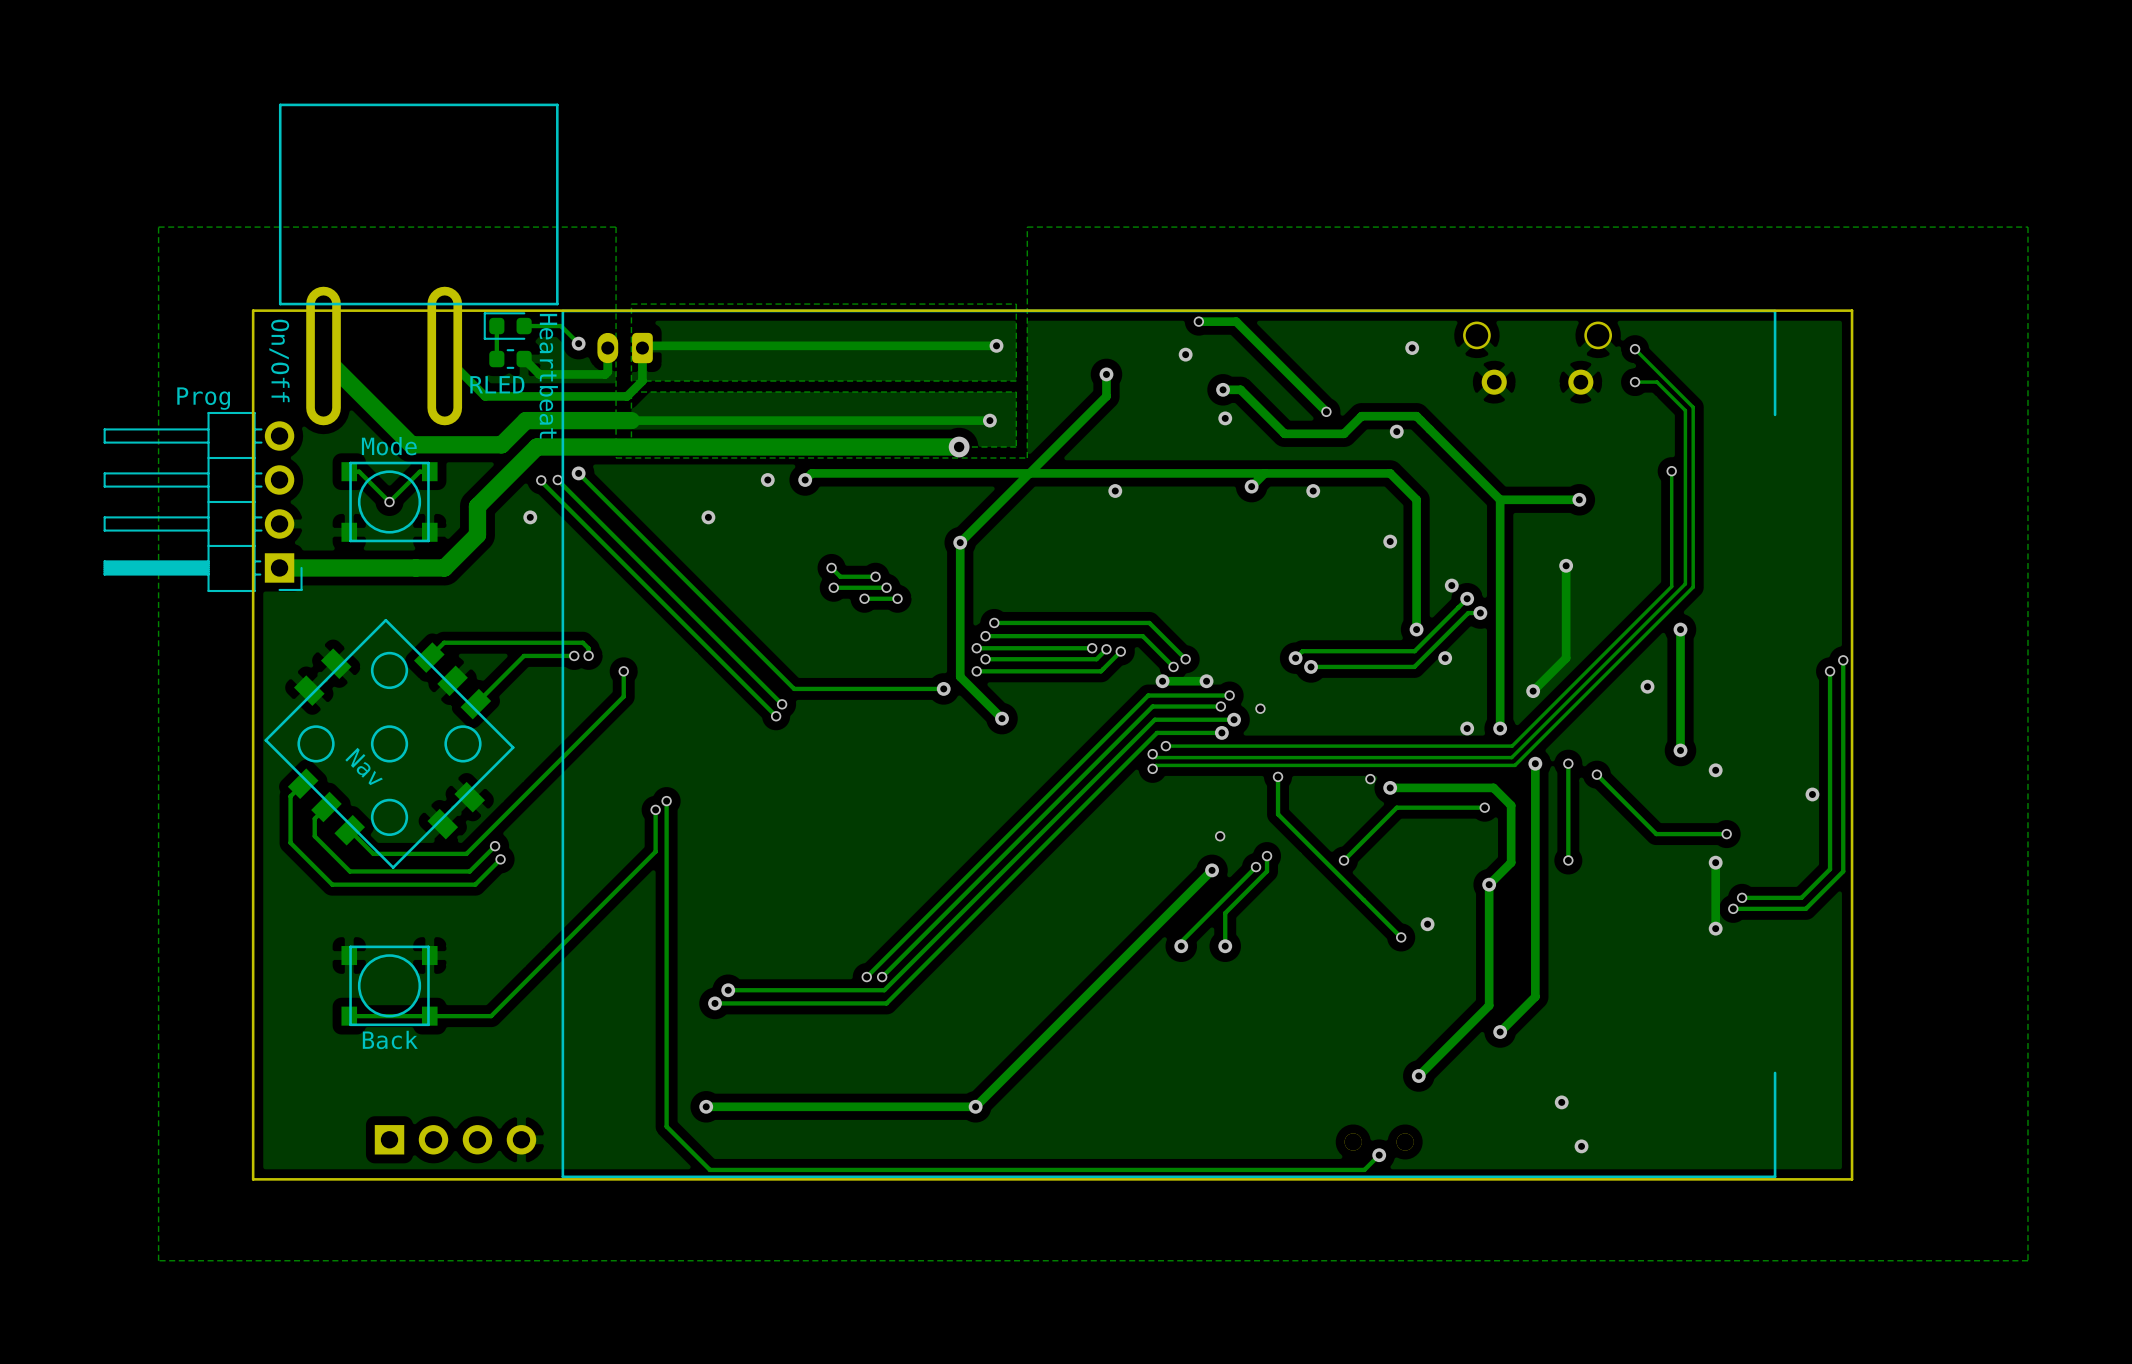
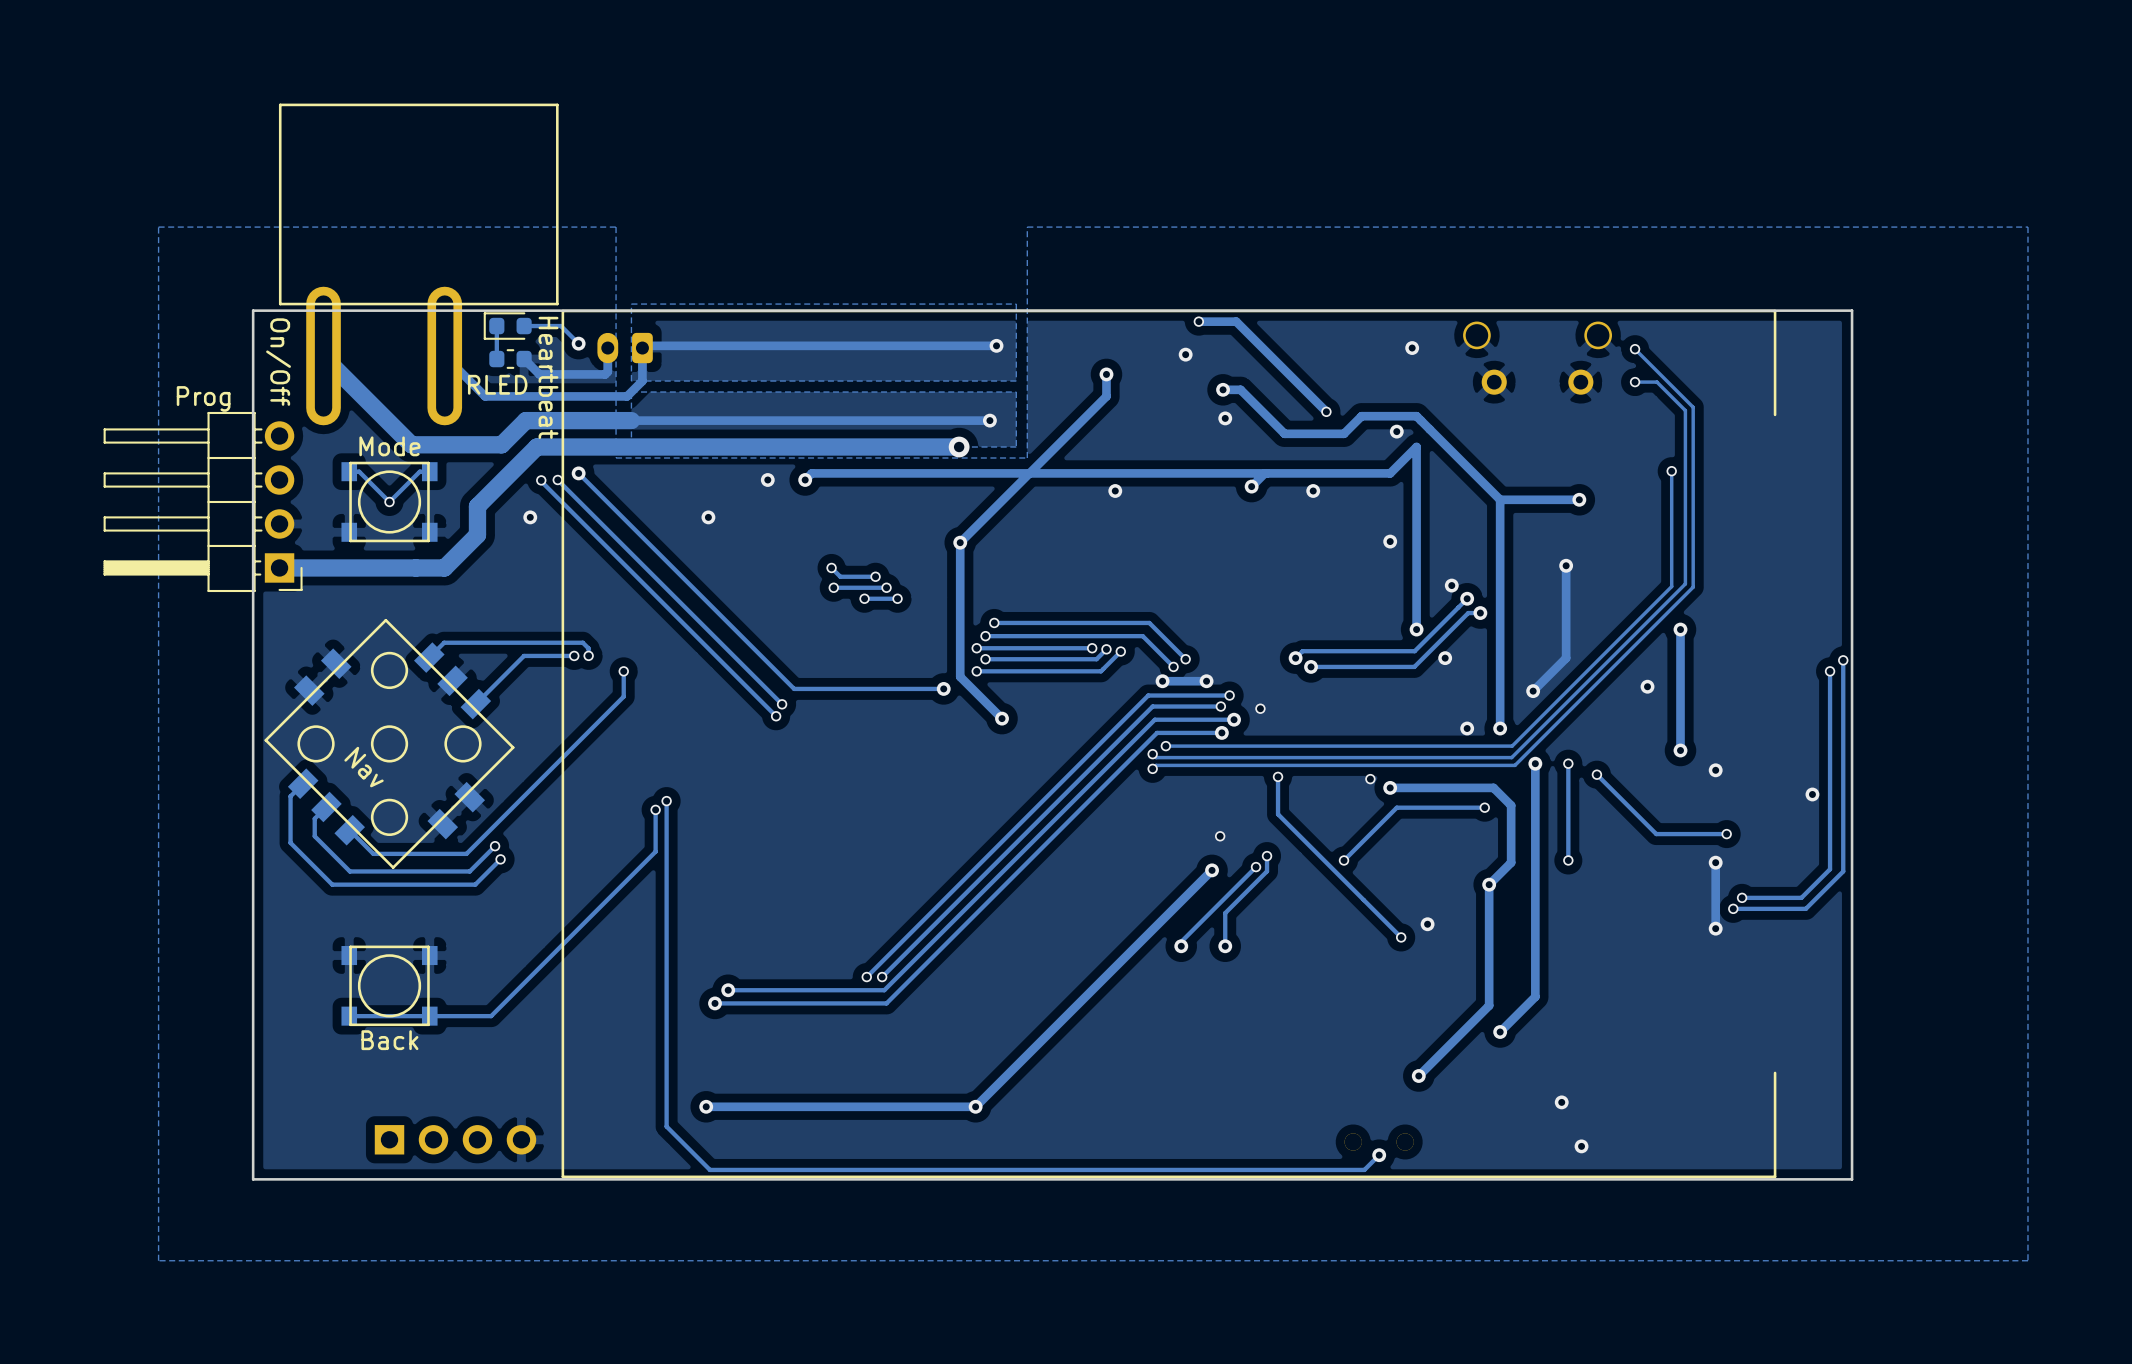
track: (1390, 473) (1416, 499) -> (1390, 473) (1416, 447) (1416, 499)

